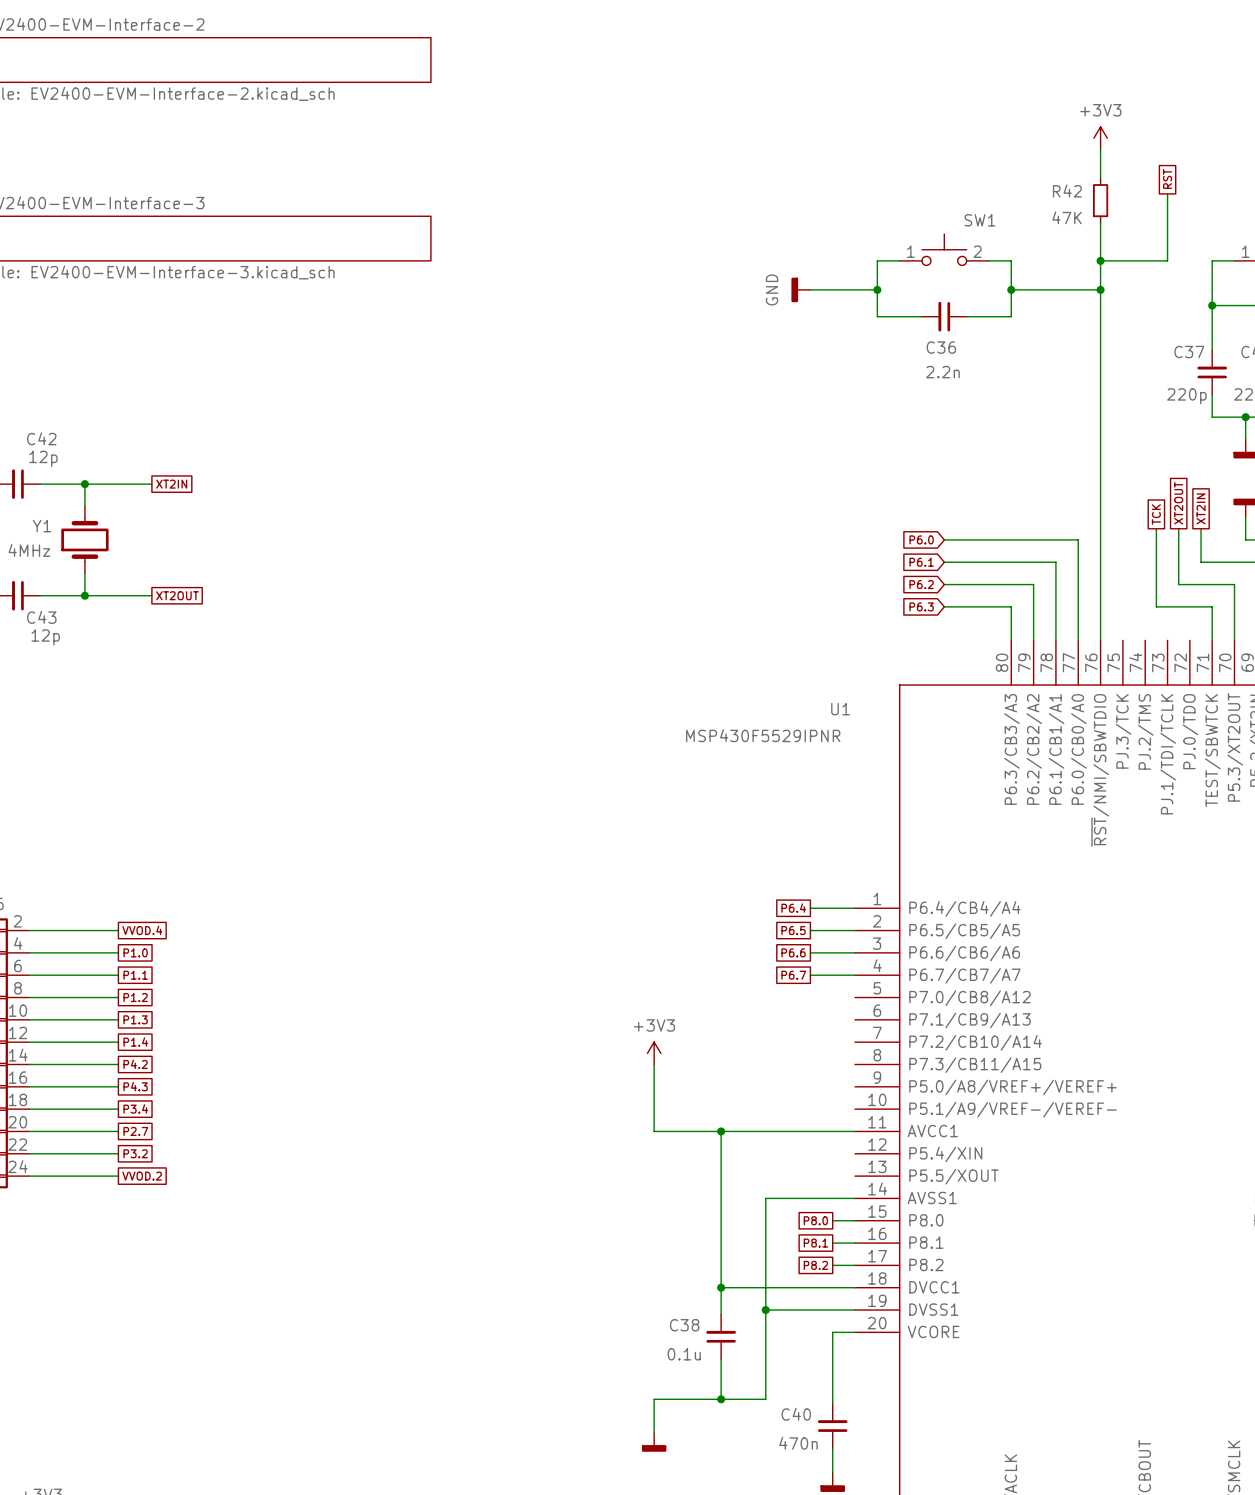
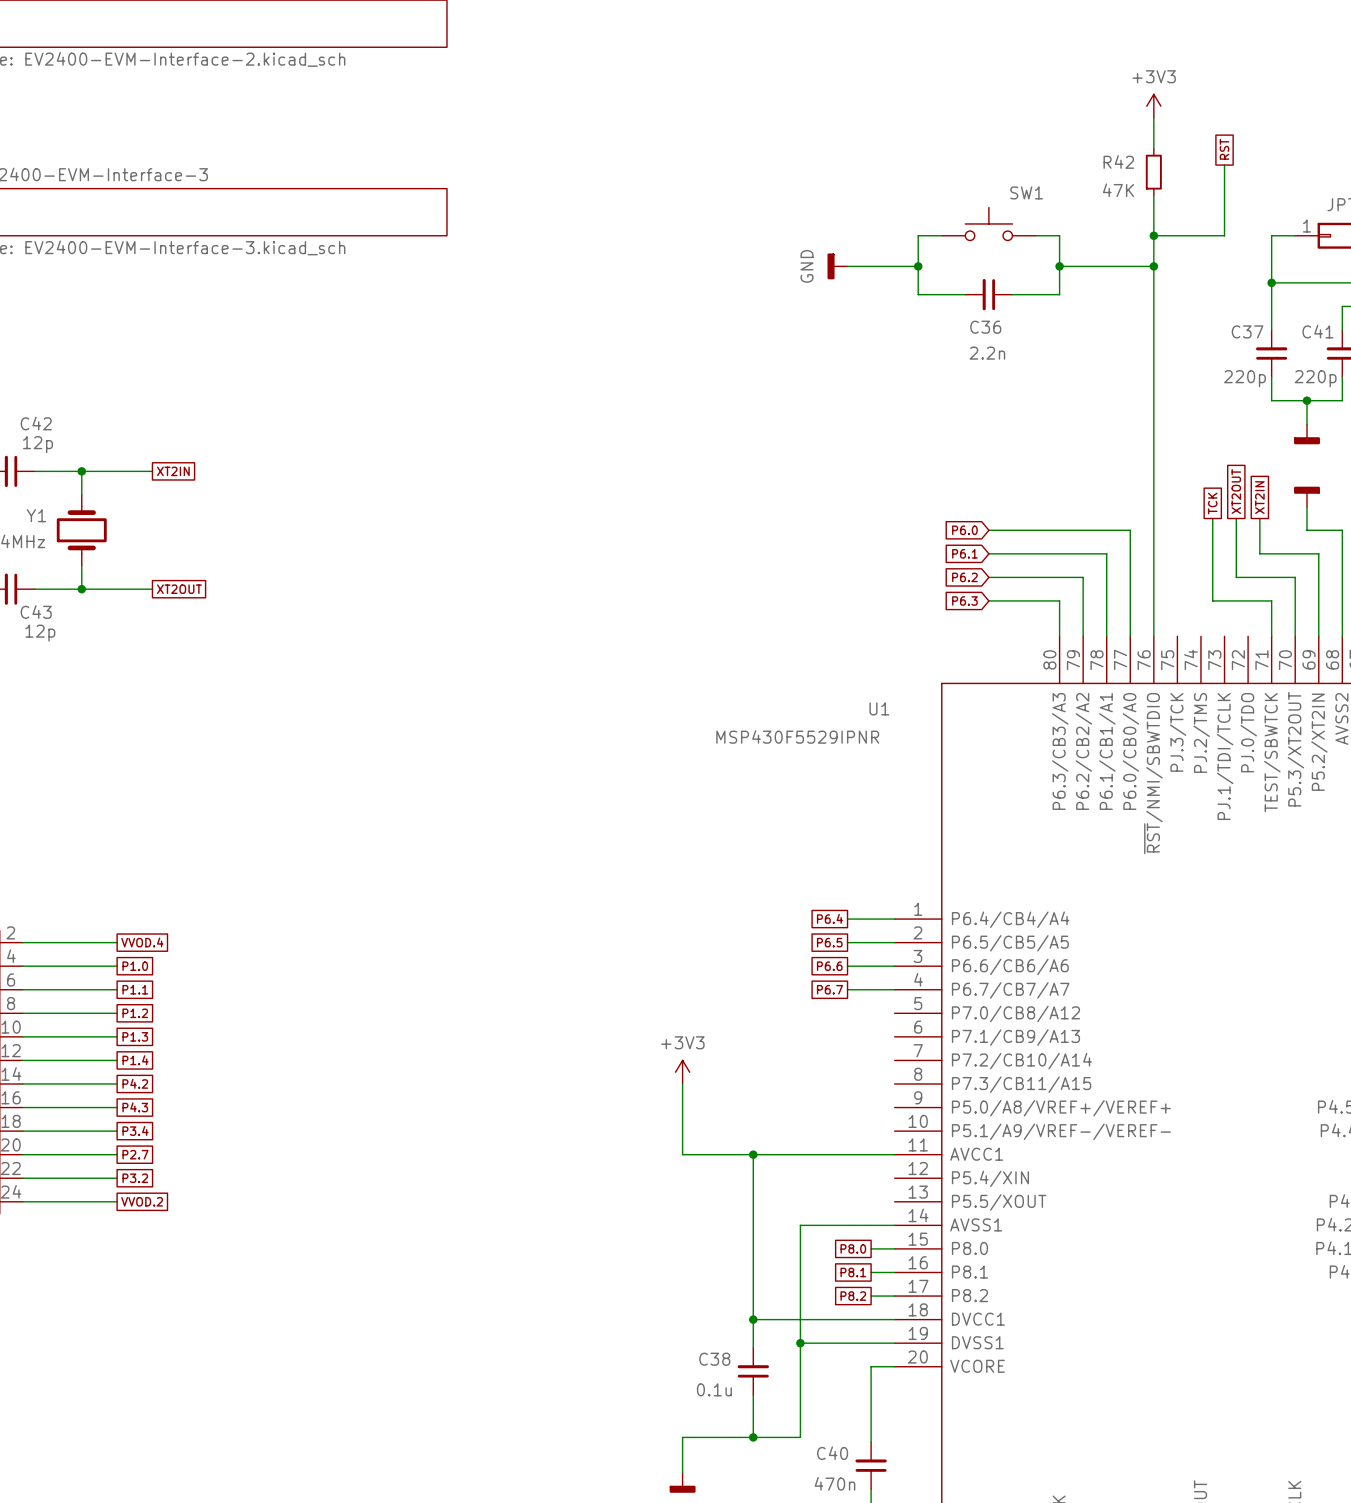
SW1 pin number: 1 (910, 251) -> none
SW1 pin number: 2 (977, 251) -> none

